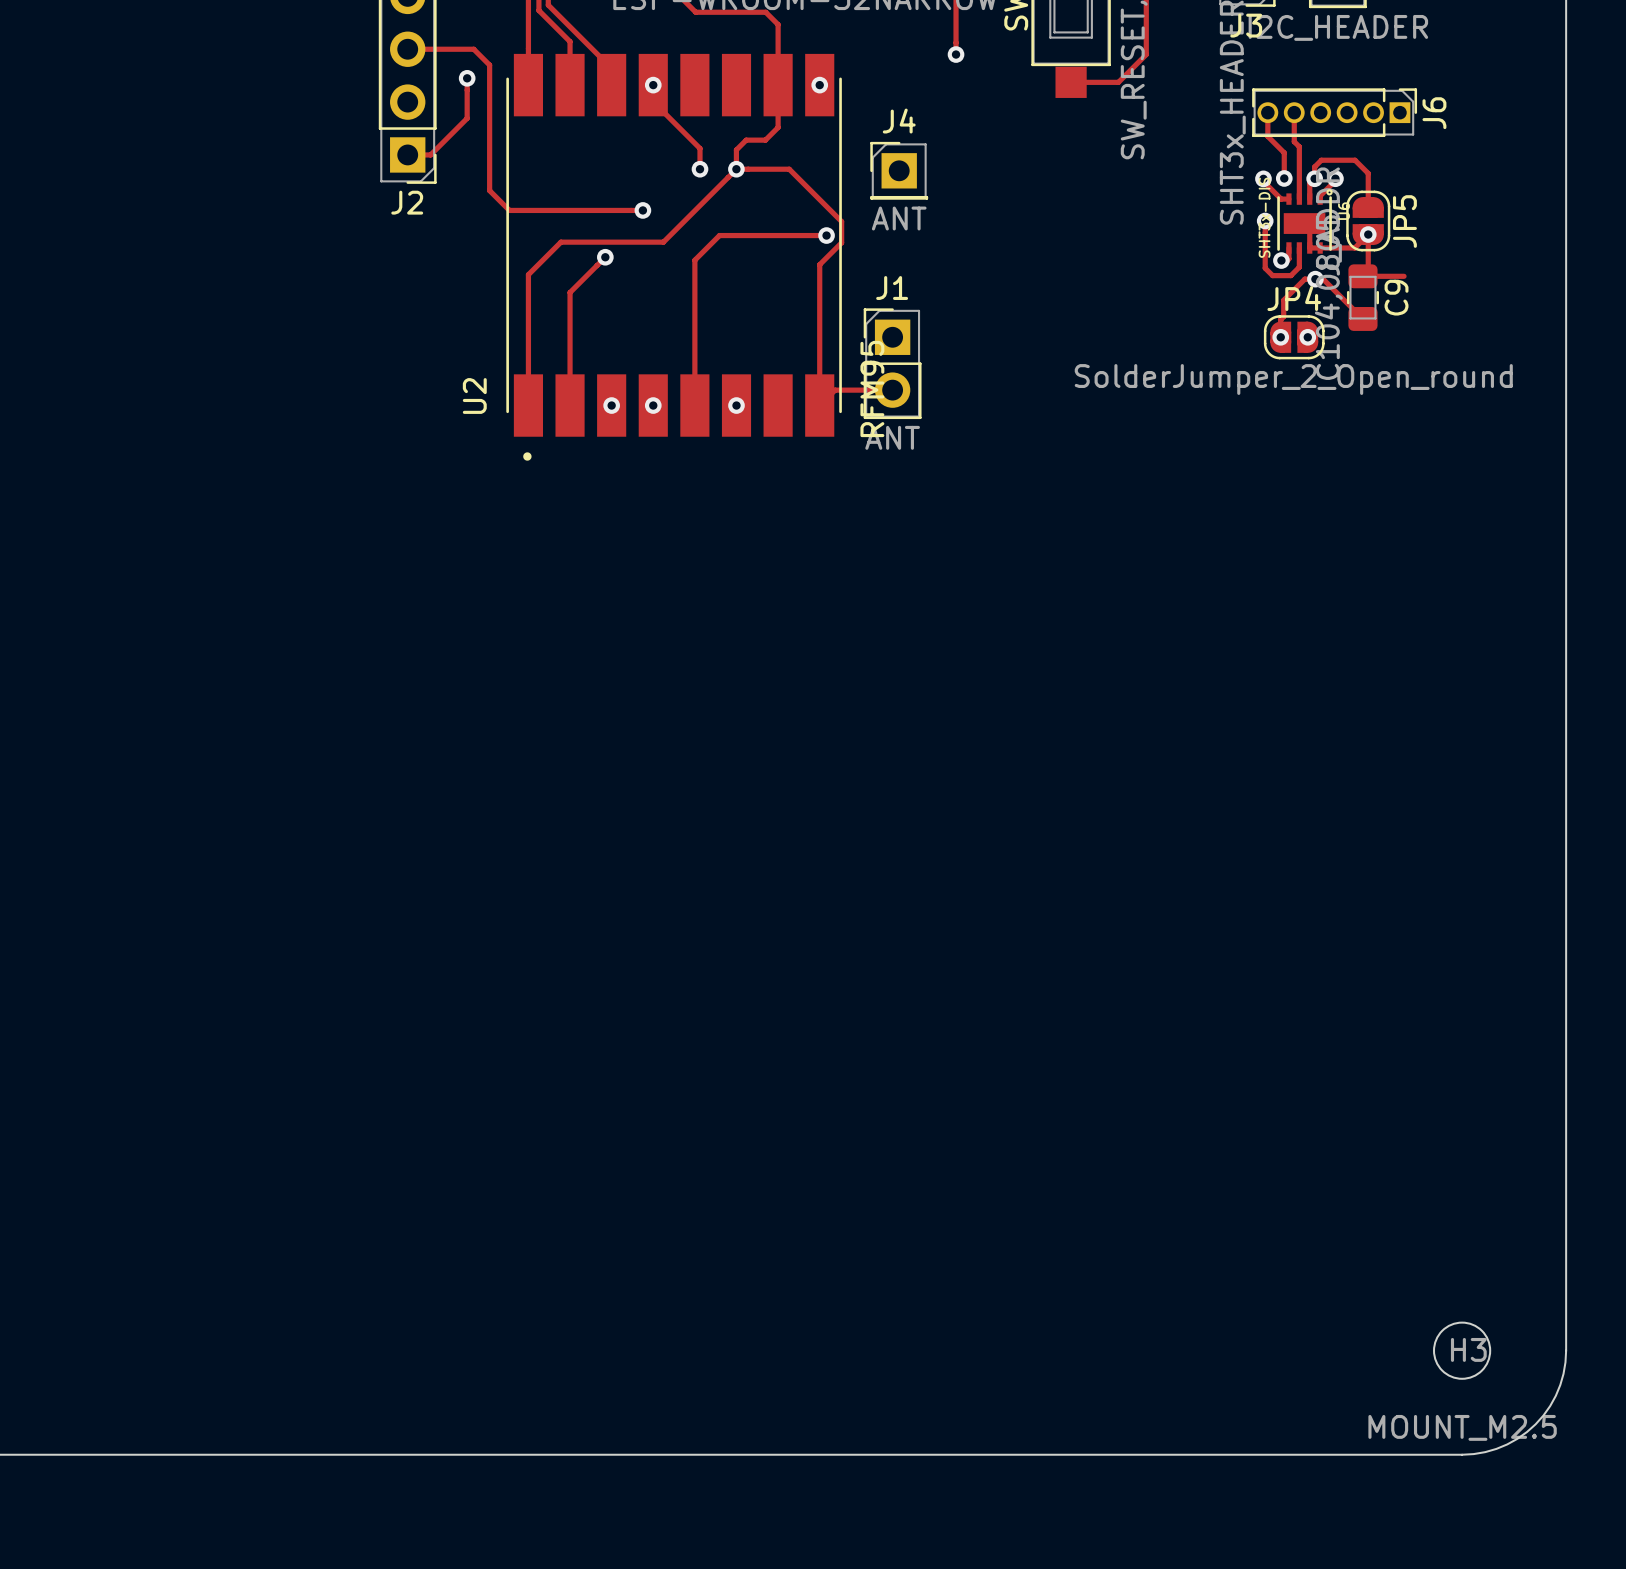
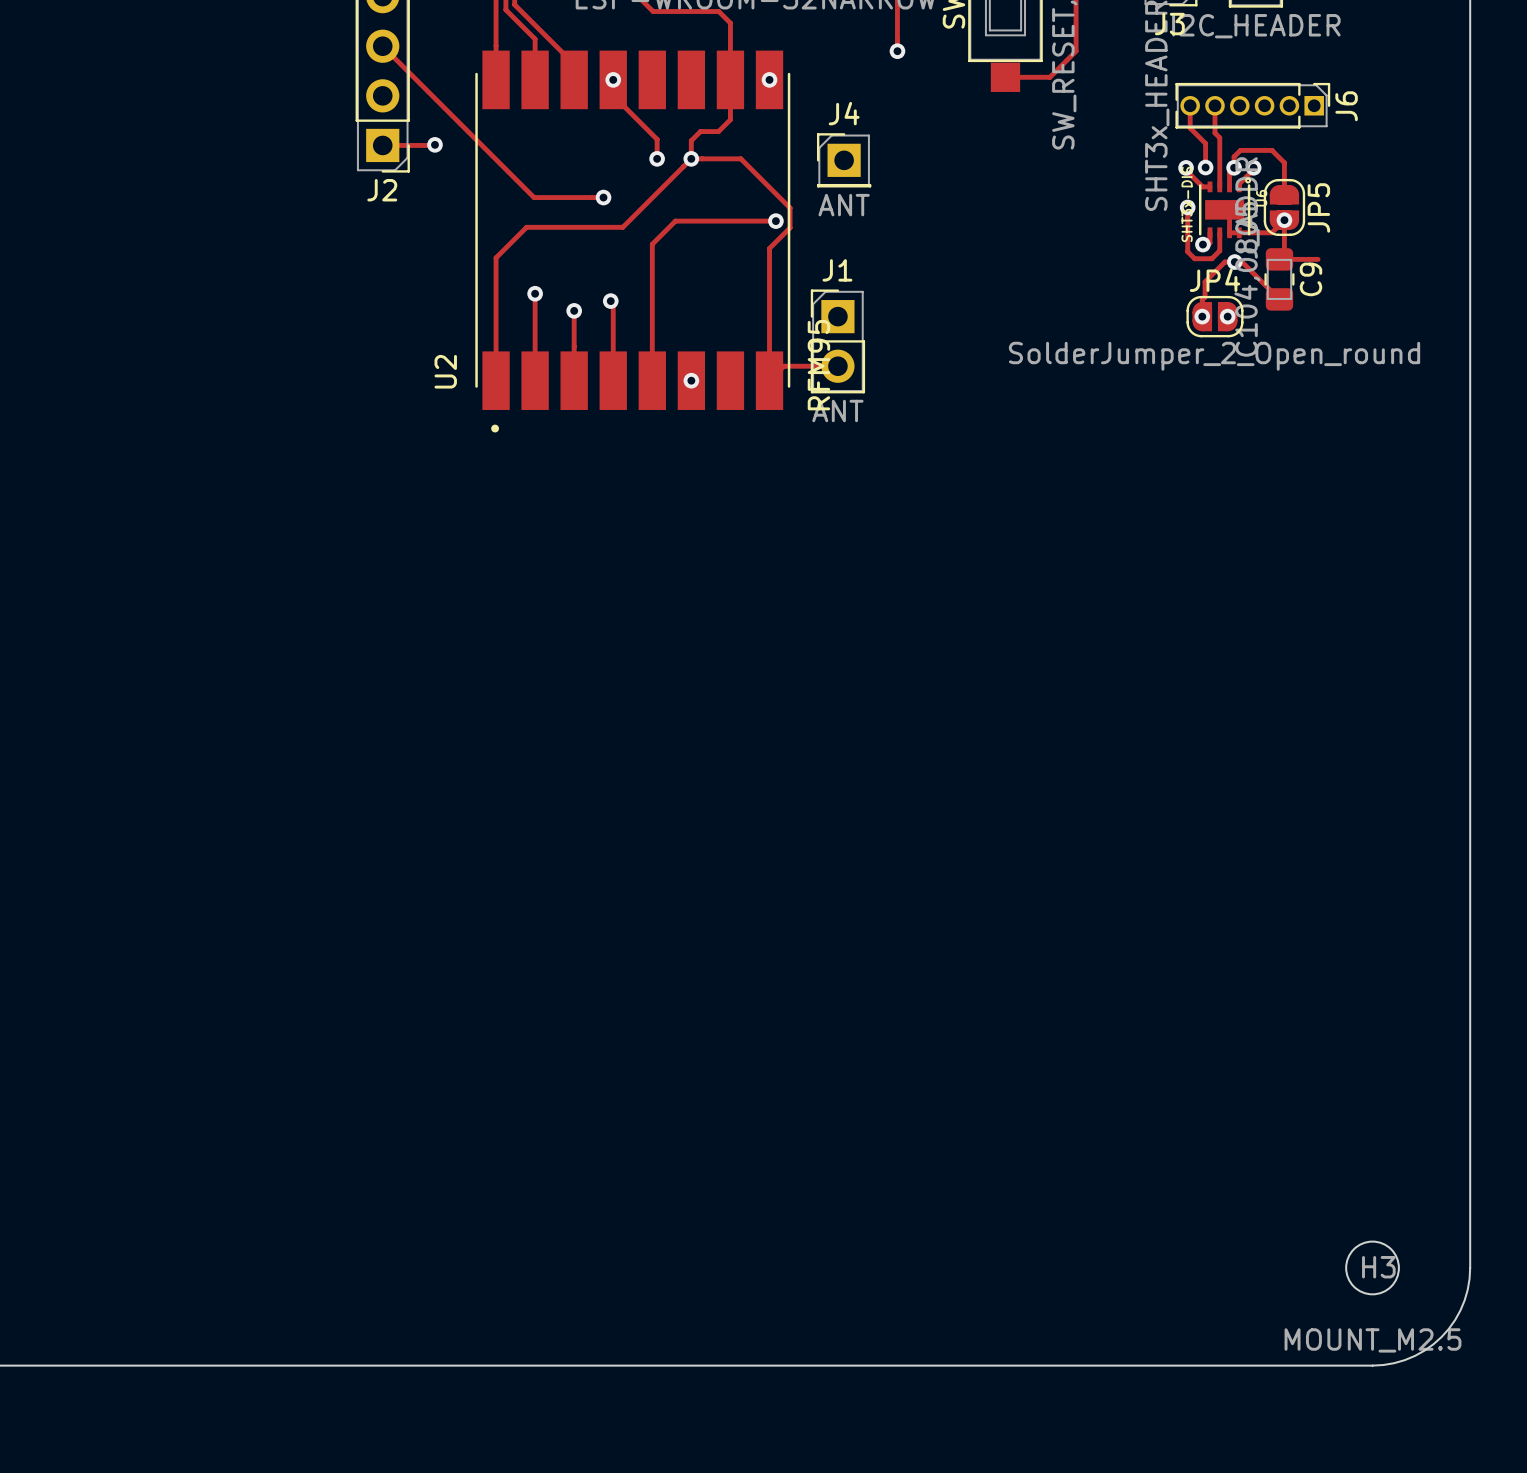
track: (407, 49) (473, 49) (489, 65) (489, 190) (509, 210) (568, 210) -> (382, 46) (534, 197)
track: (467, 78) (467, 118) (430, 154) -> (434, 144) (404, 145)
via position: (467, 78) -> (434, 144)
track: (605, 257) (570, 292) (570, 312) -> none
via: (605, 257) -> none
via: none -> (535, 293)
track: none -> (610, 301) (613, 303) (613, 380)
via: none -> (610, 301)
track: none -> (574, 310) (574, 380)
via: none -> (574, 310)
via: (611, 405) -> none
via: (653, 405) -> none

